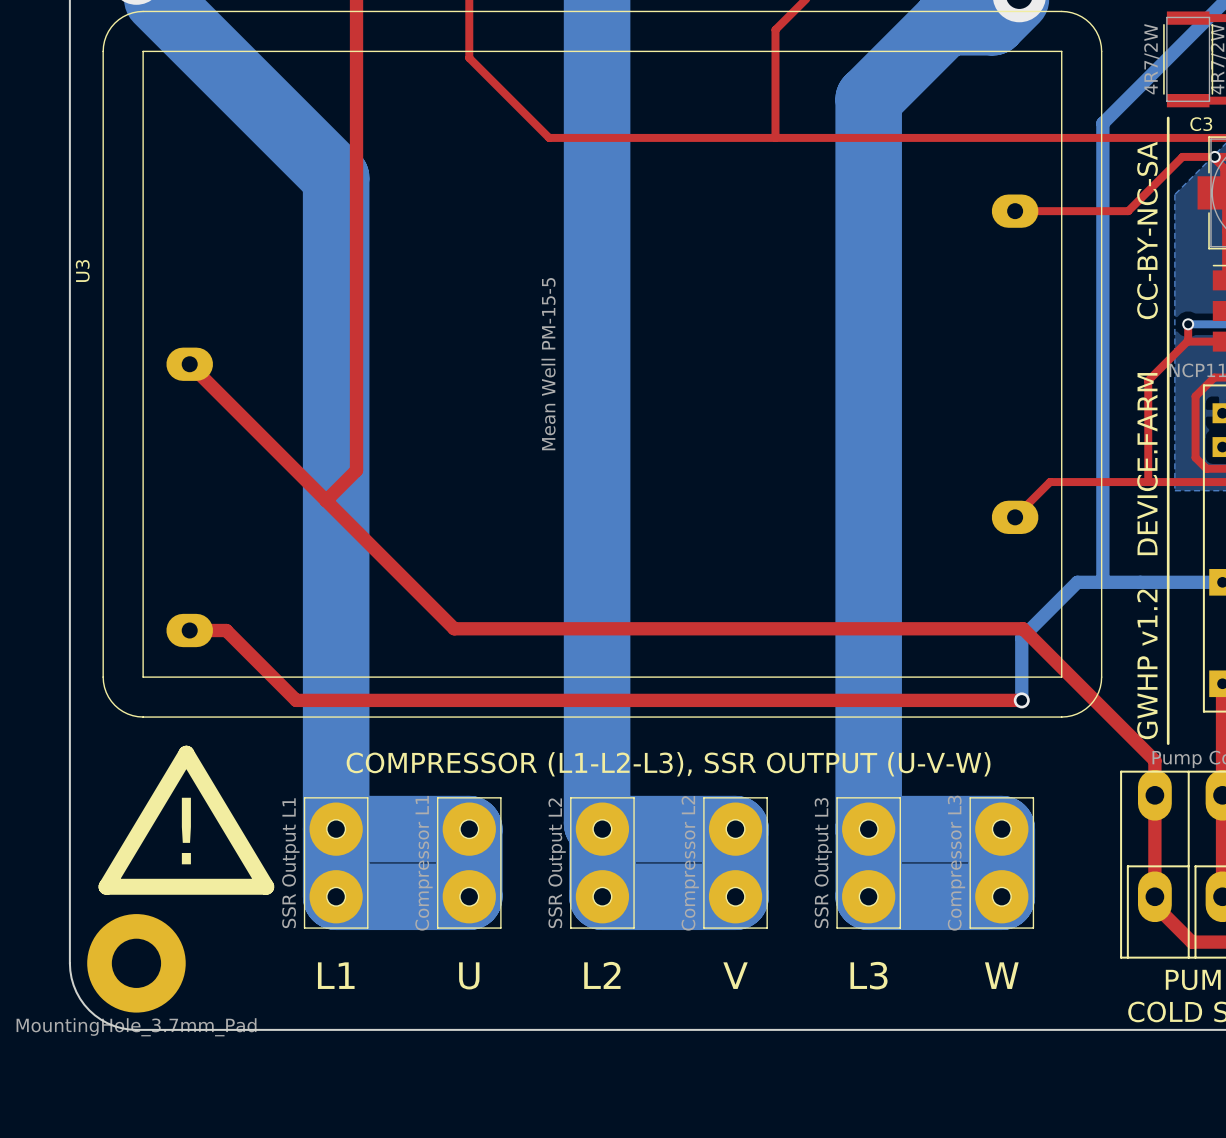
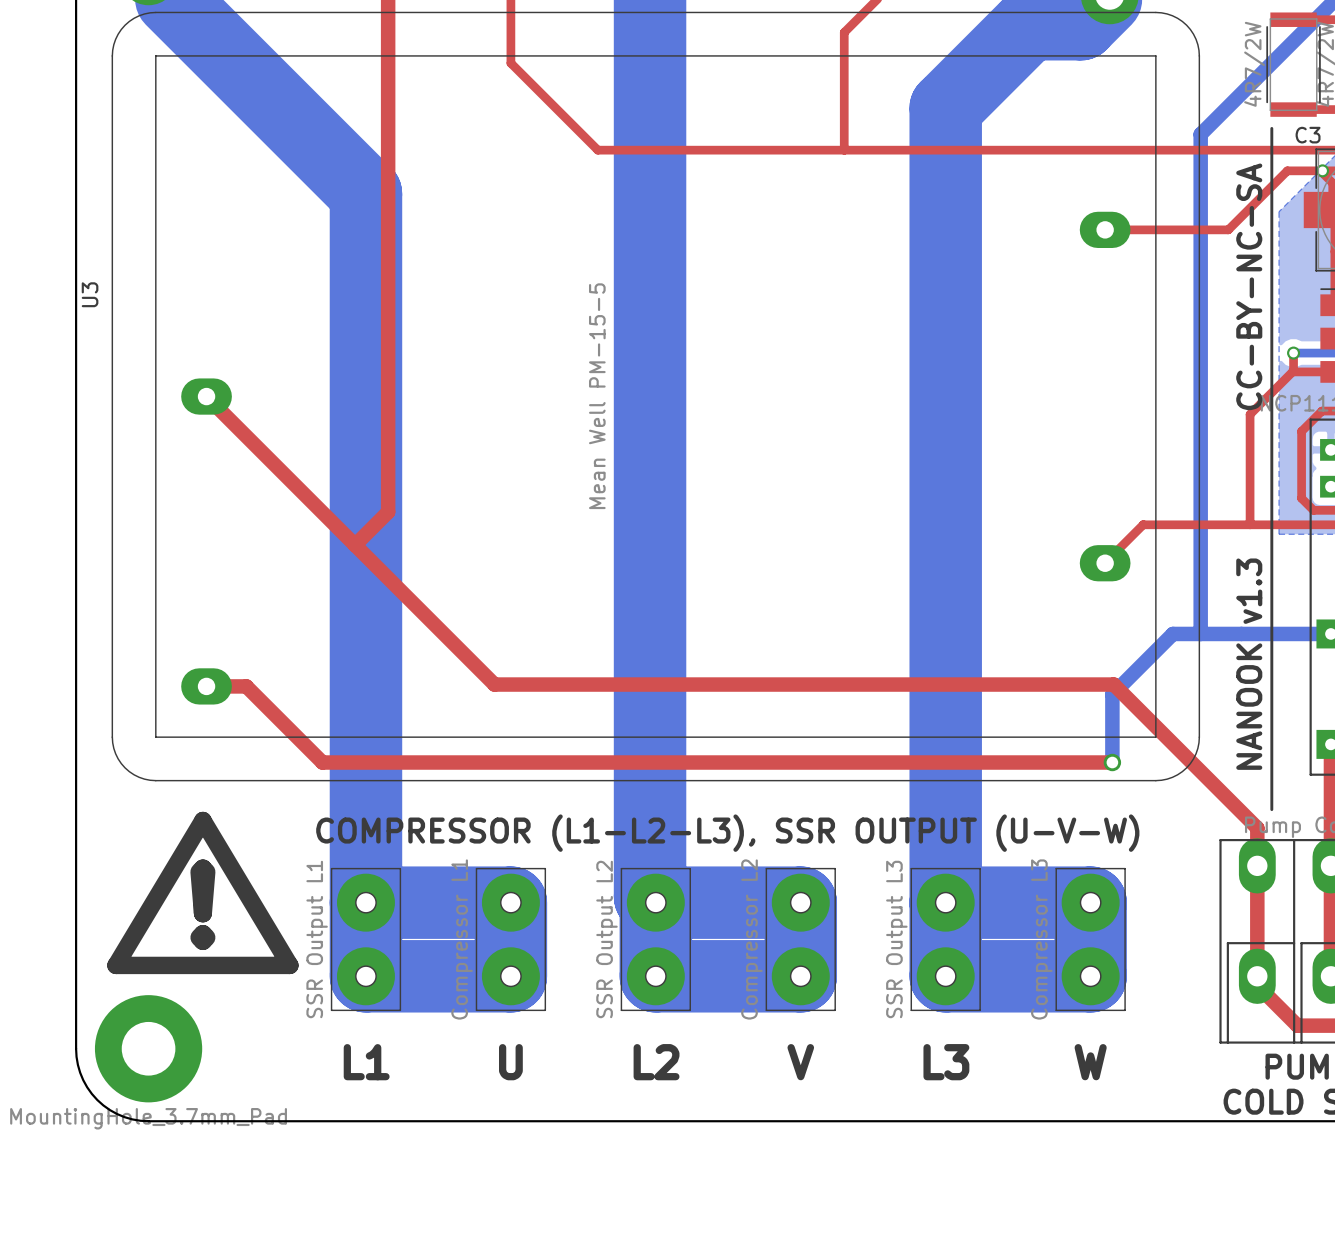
text position: CC-BY-NC-SA (1147, 230) -> CC-BY-NC-SA (1249, 286)
text: DEVICE.FARM (1147, 464) -> none
text: none -> NANOOK v1.3 (1249, 664)
text: GWHP v1.2 (1147, 664) -> none

